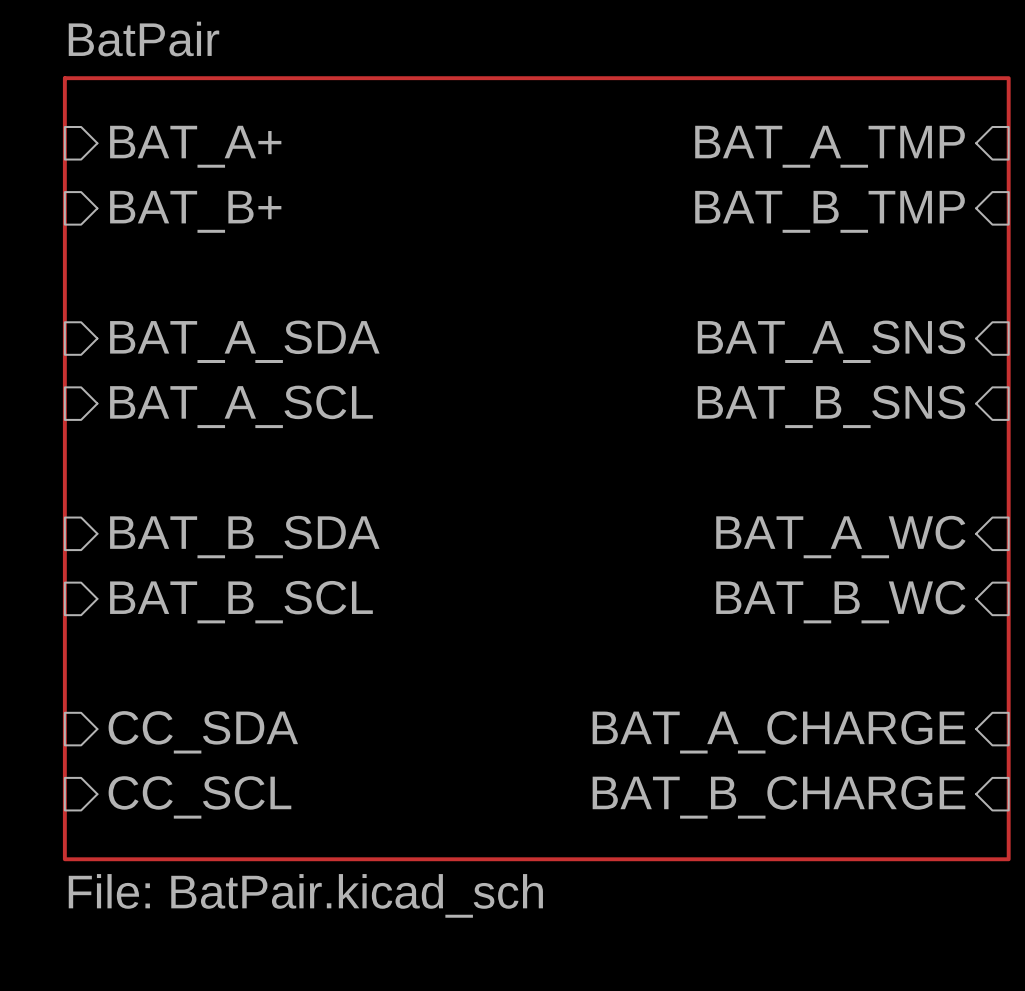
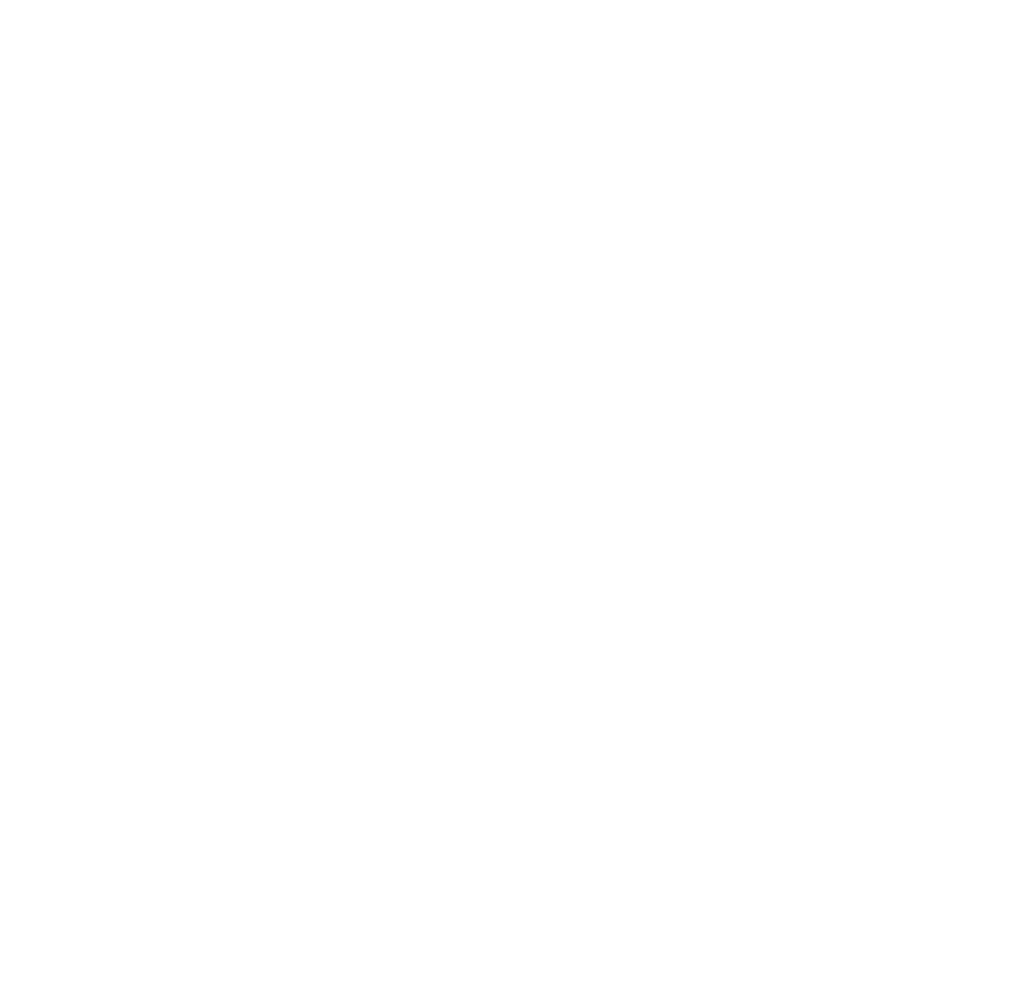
sheet pin: BAT_A+ (195, 146) -> none
sheet pin: BAT_A_TMP (830, 146) -> none
sheet pin: BAT_B+ (195, 211) -> none
sheet pin: BAT_B_TMP (830, 211) -> none
sheet pin: BAT_A_SDA (244, 341) -> none
sheet pin: BAT_A_SNS (831, 341) -> none
sheet pin: BAT_A_SCL (241, 406) -> none
sheet pin: BAT_B_SNS (831, 406) -> none
sheet BatPair: File: BatPair.kicad_sch (536, 468) -> none
sheet pin: BAT_B_SDA (244, 537) -> none
sheet pin: BAT_A_WC (840, 537) -> none
sheet pin: BAT_B_SCL (241, 602) -> none
sheet pin: BAT_B_WC (840, 602) -> none
sheet pin: CC_SDA (203, 732) -> none
sheet pin: BAT_A_CHARGE (778, 732) -> none
sheet pin: CC_SCL (199, 797) -> none
sheet pin: BAT_B_CHARGE (778, 797) -> none

